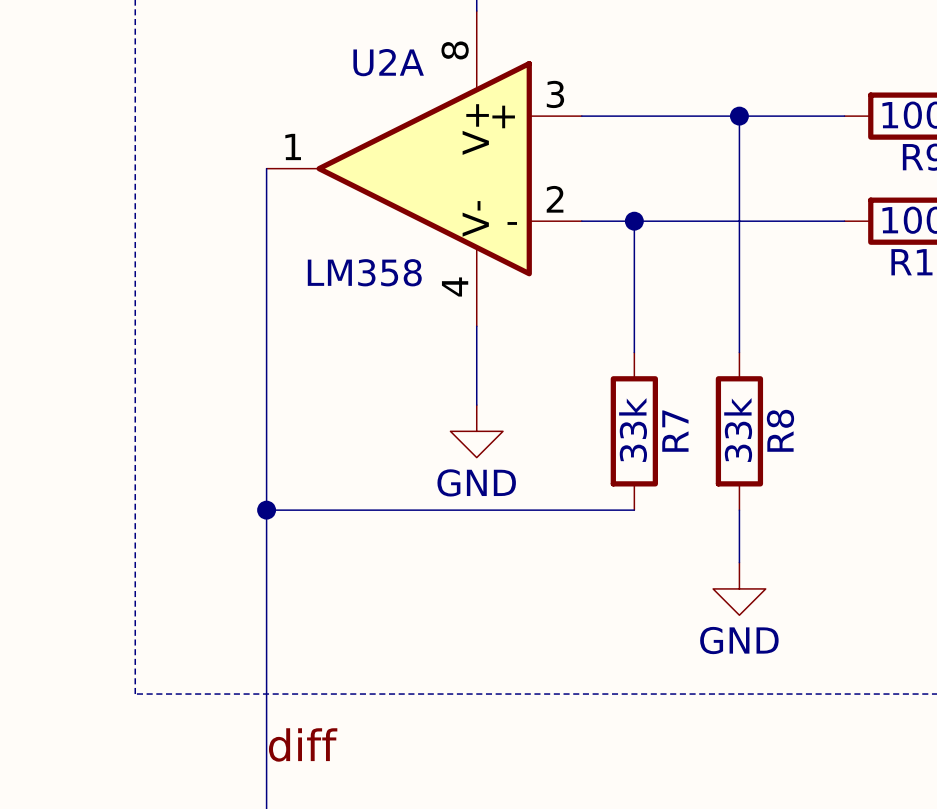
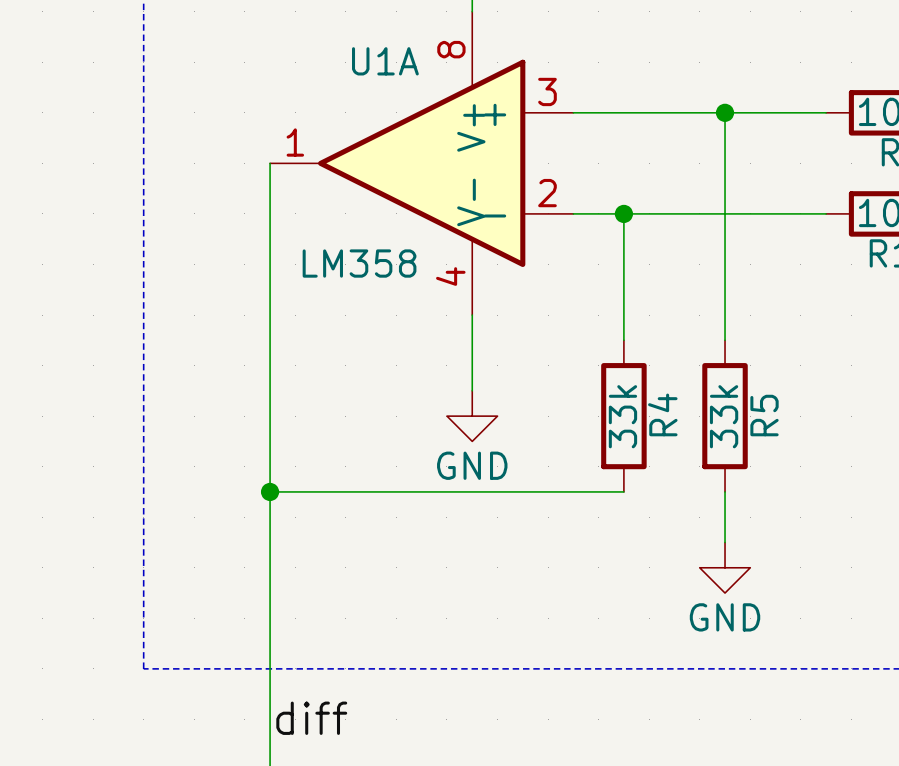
U2A name: U2A (388, 62) -> U1A (385, 61)
R8 name: R8 (780, 430) -> R5 (764, 415)
R7 name: R7 (675, 431) -> R4 (662, 414)

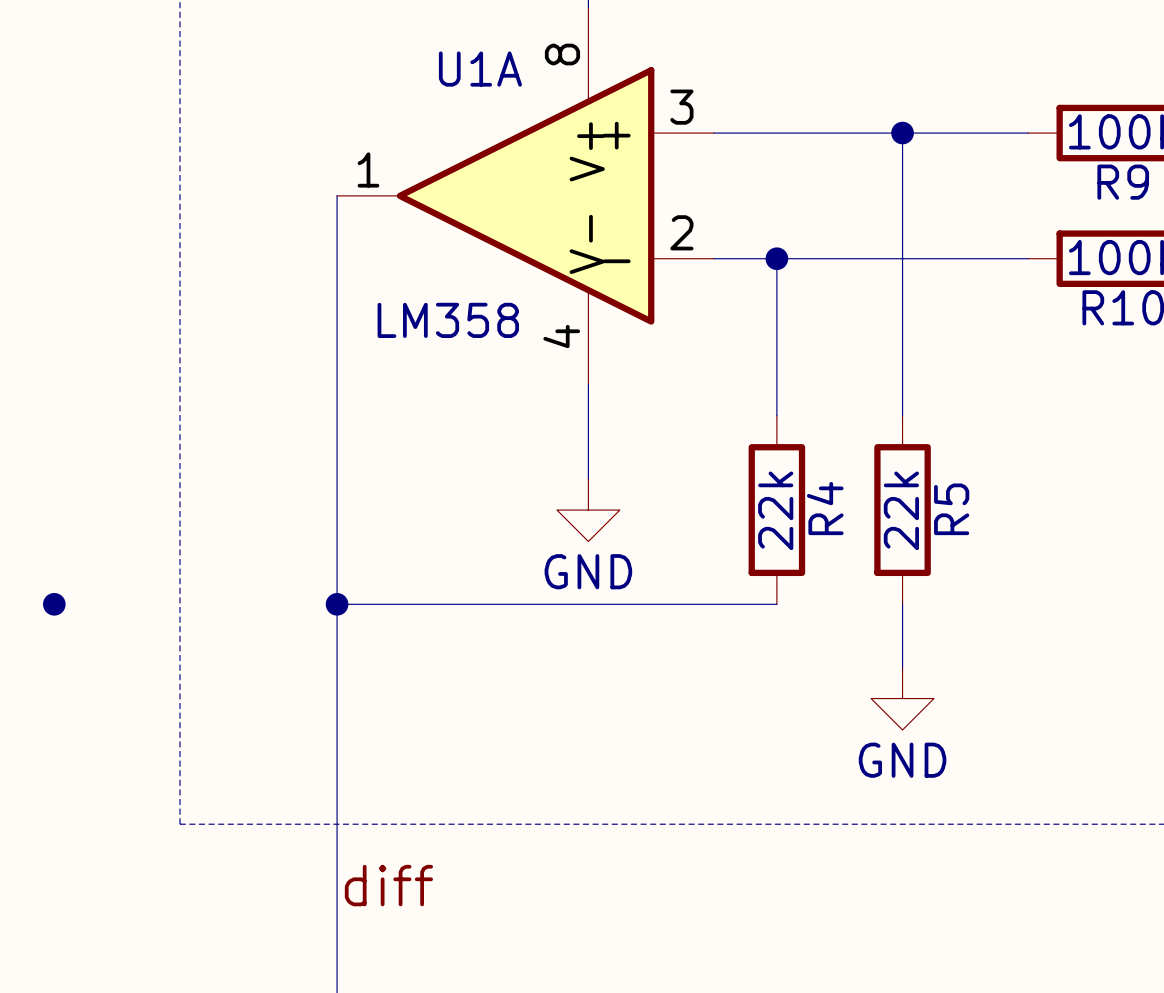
R4 value: 33k (622, 416) -> 22k (775, 510)
R5 value: 33k (724, 416) -> 22k (901, 510)
junction: none -> (54, 604)

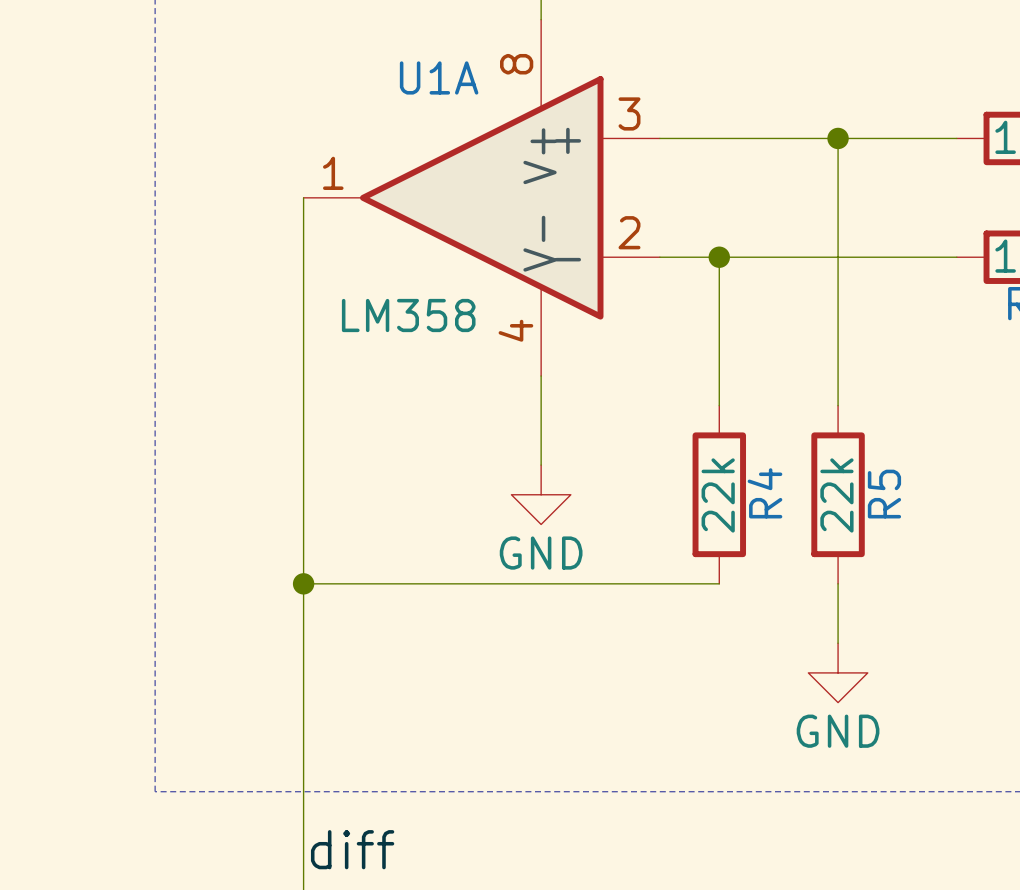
junction: (54, 604) -> none

